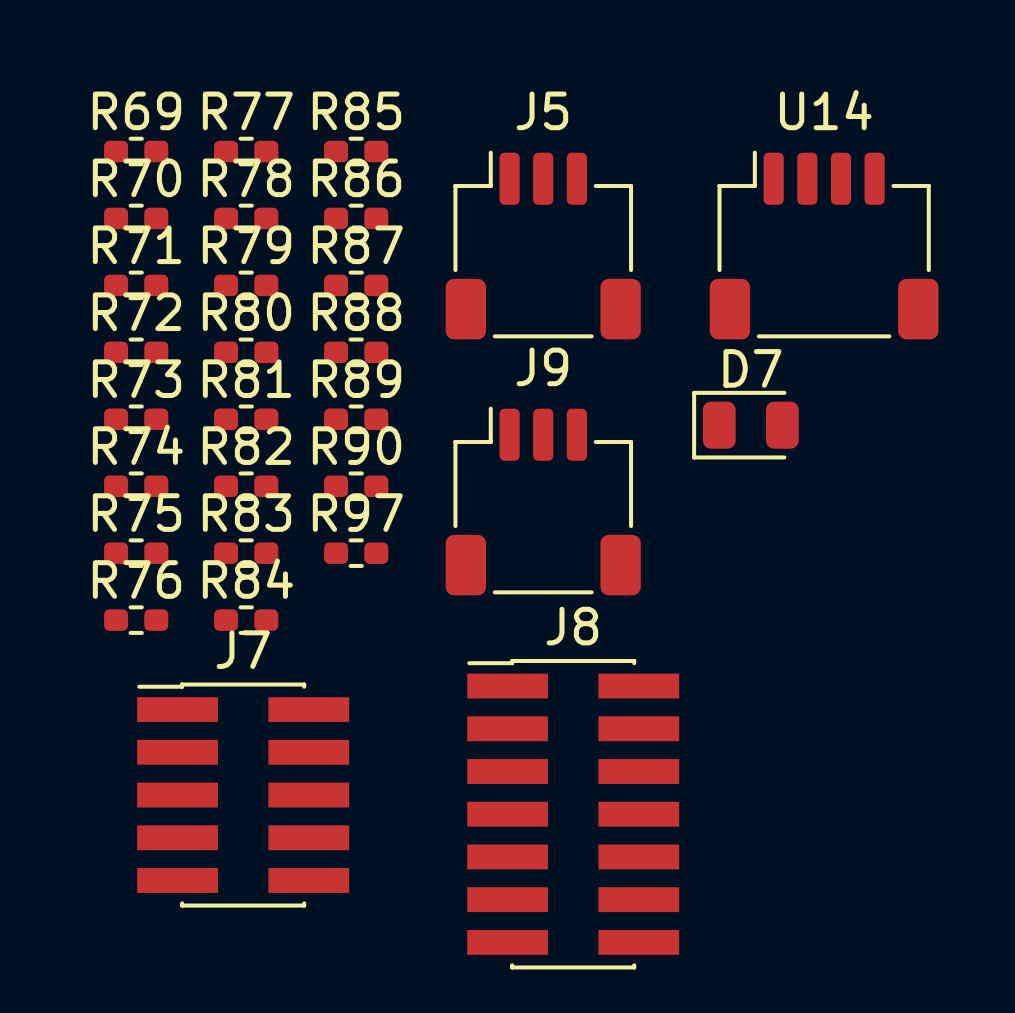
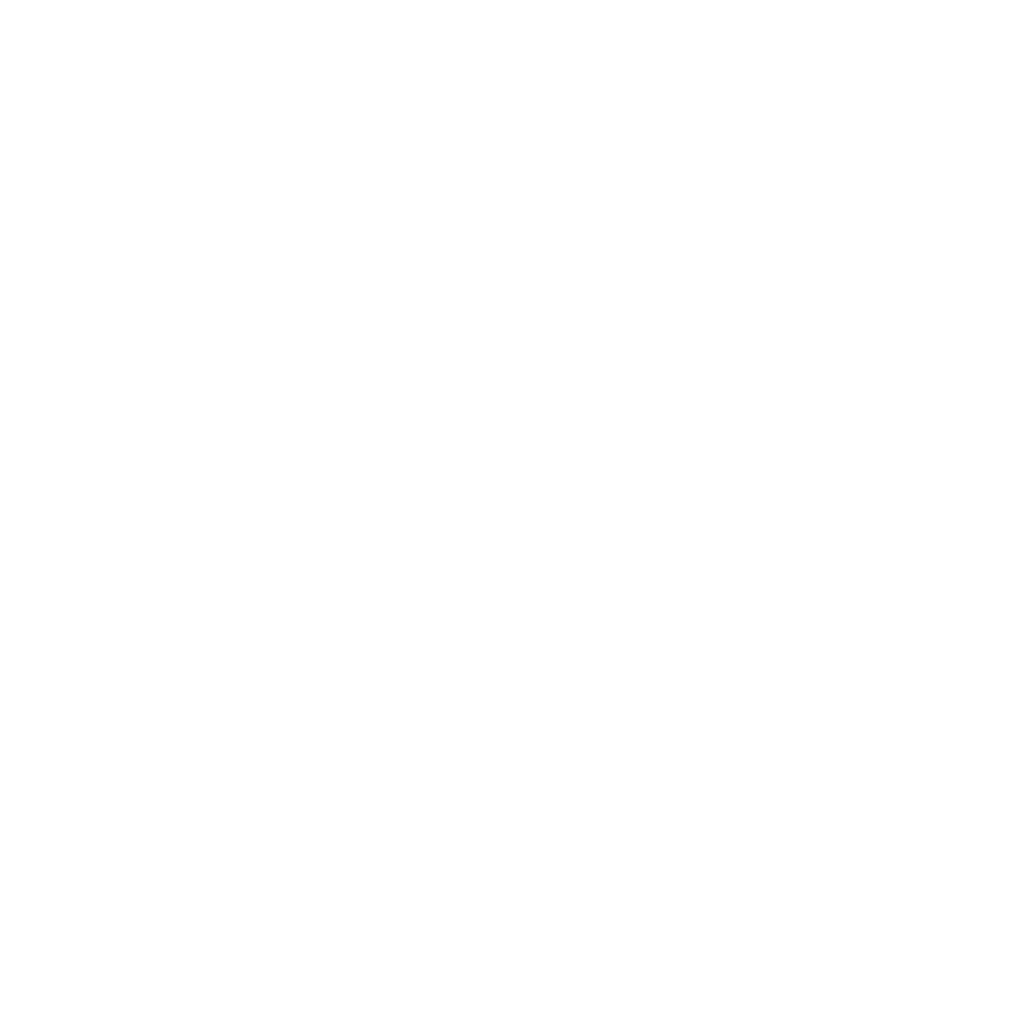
R69: (136, 151) -> none
R77: (246, 151) -> none
R85: (356, 151) -> none
R70: (136, 218) -> none
R78: (246, 218) -> none
R86: (356, 218) -> none
J5: (543, 245) -> none
U14: (824, 245) -> none
R71: (136, 285) -> none
R79: (246, 285) -> none
R87: (356, 285) -> none
R72: (136, 352) -> none
R80: (246, 352) -> none
R88: (356, 352) -> none
R73: (136, 419) -> none
R81: (246, 419) -> none
R89: (356, 419) -> none
D7: (745, 425) -> none
R74: (136, 486) -> none
R82: (246, 486) -> none
R90: (356, 486) -> none
J9: (543, 501) -> none
R75: (136, 553) -> none
R83: (246, 553) -> none
R97: (356, 553) -> none
R76: (136, 620) -> none
R84: (246, 620) -> none
J7: (243, 795) -> none
J8: (573, 814) -> none

